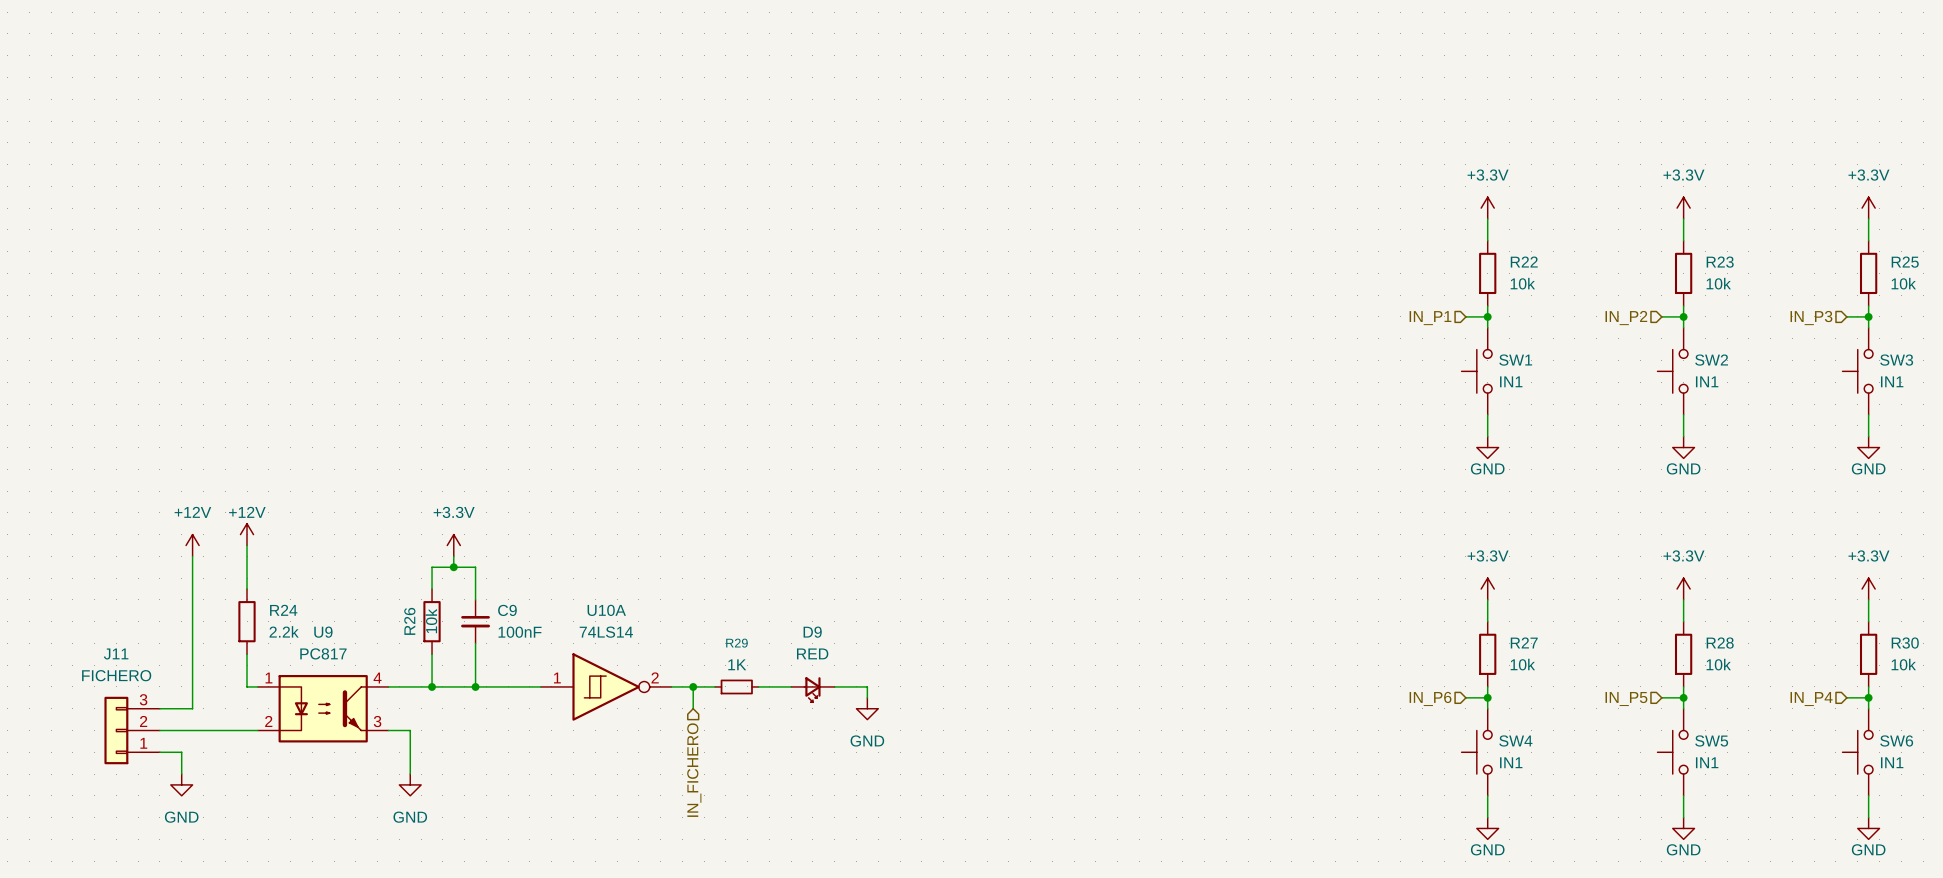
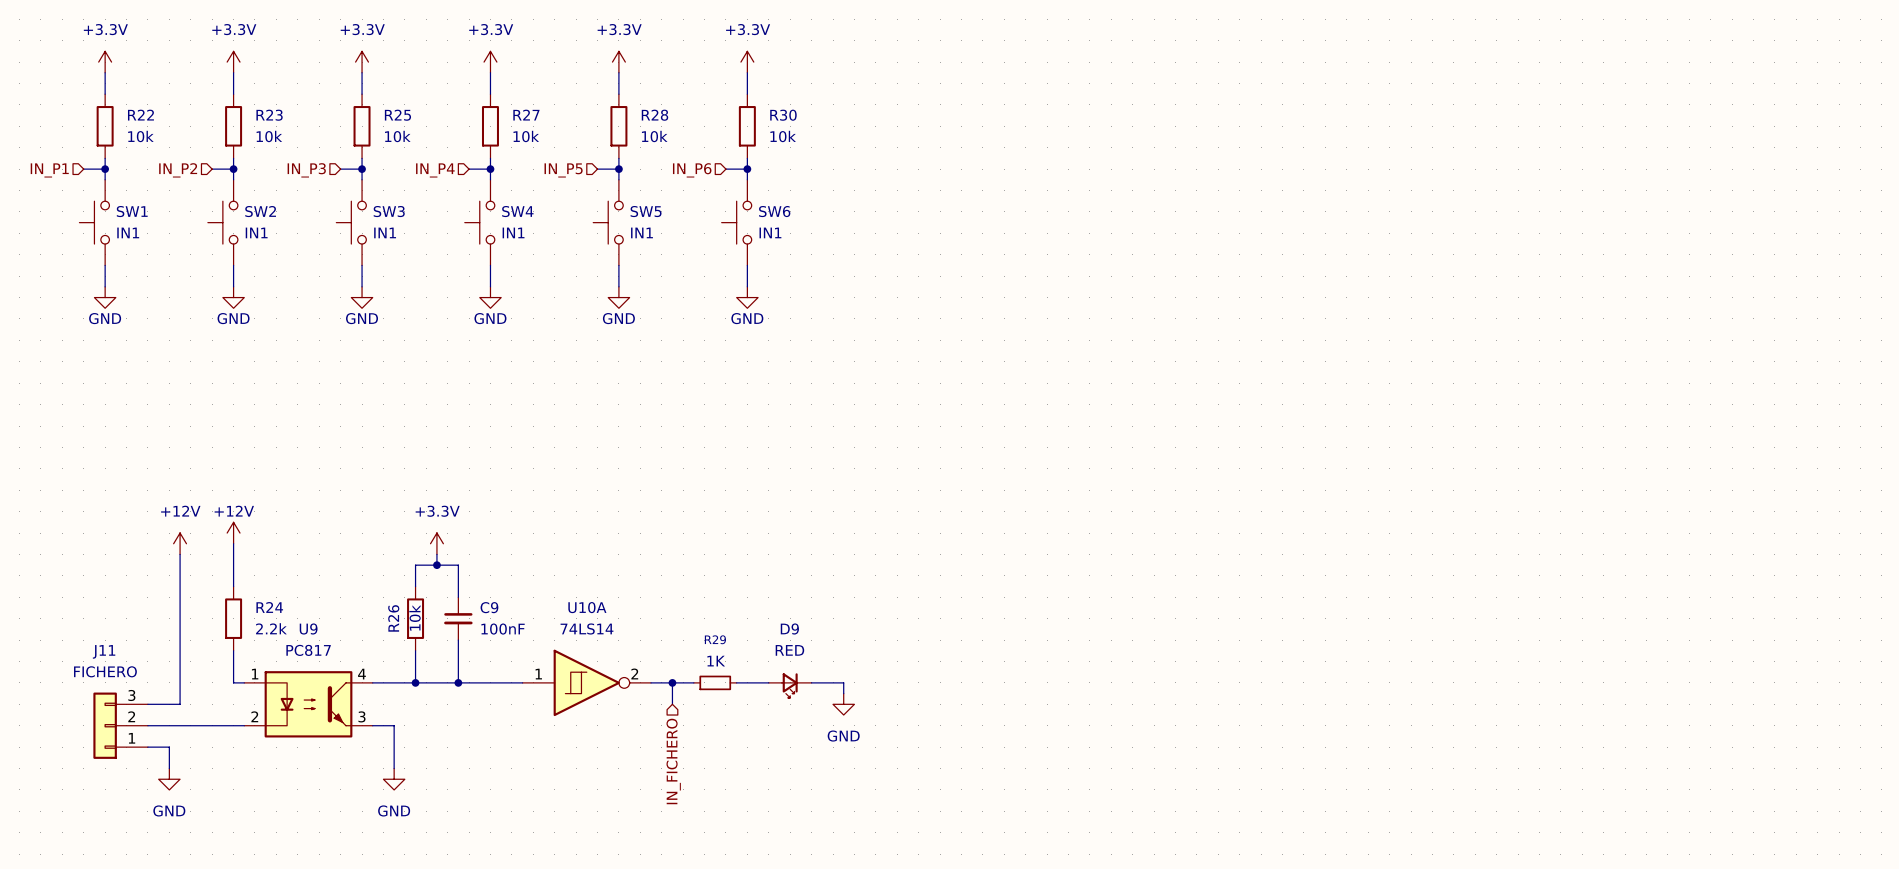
power symbol: none -> +3.3V (105, 62)
power symbol: none -> +3.3V (233, 62)
power symbol: none -> +3.3V (362, 62)
power symbol: none -> +3.3V (490, 62)
power symbol: none -> +3.3V (618, 62)
power symbol: none -> +3.3V (747, 62)
wire: none -> (105, 72) (105, 94)
wire: none -> (233, 72) (233, 94)
wire: none -> (362, 72) (362, 94)
wire: none -> (490, 72) (490, 94)
wire: none -> (618, 72) (618, 94)
wire: none -> (747, 72) (747, 94)
wire: none -> (105, 158) (105, 179)
wire: none -> (233, 158) (233, 179)
wire: none -> (362, 158) (362, 179)
wire: none -> (490, 158) (490, 179)
wire: none -> (618, 158) (618, 179)
wire: none -> (747, 158) (747, 179)
wire: none -> (83, 169) (105, 169)
junction: none -> (105, 169)
wire: none -> (212, 169) (233, 169)
junction: none -> (233, 169)
wire: none -> (340, 169) (362, 169)
junction: none -> (362, 169)
wire: none -> (469, 169) (490, 169)
junction: none -> (490, 169)
wire: none -> (597, 169) (618, 169)
junction: none -> (618, 169)
wire: none -> (725, 169) (747, 169)
junction: none -> (747, 169)
hierarchical label: none -> IN_P1 (49, 170)
hierarchical label: none -> IN_P2 (178, 170)
hierarchical label: none -> IN_P3 (306, 170)
hierarchical label: none -> IN_P4 (435, 170)
hierarchical label: none -> IN_P5 (563, 170)
hierarchical label: none -> IN_P6 (692, 170)
power symbol: +3.3V (1487, 208) -> none
power symbol: +3.3V (1683, 208) -> none
power symbol: +3.3V (1868, 208) -> none
wire: (1487, 218) (1487, 240) -> none
wire: (1683, 218) (1683, 240) -> none
wire: (1868, 218) (1868, 240) -> none
wire: none -> (105, 265) (105, 286)
wire: none -> (233, 265) (233, 286)
wire: none -> (362, 265) (362, 286)
wire: none -> (490, 265) (490, 286)
wire: none -> (618, 265) (618, 286)
wire: none -> (747, 265) (747, 286)
R22 position: (1487, 273) -> (105, 126)
R23 position: (1683, 273) -> (233, 126)
R25 position: (1868, 273) -> (362, 126)
power symbol: none -> GND (105, 297)
power symbol: none -> GND (233, 297)
power symbol: none -> GND (362, 297)
power symbol: none -> GND (490, 297)
power symbol: none -> GND (618, 297)
power symbol: none -> GND (747, 297)
wire: (1487, 306) (1487, 327) -> none
wire: (1683, 306) (1683, 327) -> none
wire: (1868, 306) (1868, 327) -> none
wire: (1465, 316) (1487, 316) -> none
junction: (1487, 316) -> none
wire: (1661, 316) (1683, 316) -> none
junction: (1683, 316) -> none
wire: (1846, 316) (1868, 316) -> none
junction: (1868, 316) -> none
hierarchical label: IN_P1 (1430, 318) -> none
hierarchical label: IN_P2 (1626, 318) -> none
hierarchical label: IN_P3 (1811, 318) -> none
SW1 position: (1476, 371) -> (94, 222)
SW2 position: (1672, 371) -> (222, 222)
SW3 position: (1857, 371) -> (351, 222)
wire: (1487, 414) (1487, 436) -> none
wire: (1683, 414) (1683, 436) -> none
wire: (1868, 414) (1868, 436) -> none
power symbol: GND (1487, 447) -> none
power symbol: GND (1683, 447) -> none
power symbol: GND (1868, 447) -> none
power symbol: +3.3V (1487, 589) -> none
power symbol: +3.3V (1683, 589) -> none
power symbol: +3.3V (1868, 589) -> none
wire: (1487, 599) (1487, 621) -> none
wire: (1683, 599) (1683, 621) -> none
wire: (1868, 599) (1868, 621) -> none
R27 position: (1487, 654) -> (490, 126)
R28 position: (1683, 654) -> (618, 126)
R30 position: (1868, 654) -> (747, 126)
wire: (1487, 686) (1487, 708) -> none
wire: (1683, 686) (1683, 708) -> none
wire: (1868, 686) (1868, 708) -> none
wire: (1465, 697) (1487, 697) -> none
junction: (1487, 697) -> none
wire: (1661, 697) (1683, 697) -> none
junction: (1683, 697) -> none
wire: (1846, 697) (1868, 697) -> none
junction: (1868, 697) -> none
hierarchical label: IN_P6 (1430, 698) -> none
hierarchical label: IN_P5 (1626, 699) -> none
hierarchical label: IN_P4 (1811, 699) -> none
SW4 position: (1476, 752) -> (479, 222)
SW5 position: (1672, 752) -> (608, 222)
SW6 position: (1857, 752) -> (736, 222)
wire: (1487, 795) (1487, 817) -> none
wire: (1683, 795) (1683, 817) -> none
wire: (1868, 795) (1868, 817) -> none
power symbol: GND (1487, 828) -> none
power symbol: GND (1683, 828) -> none
power symbol: GND (1868, 828) -> none

